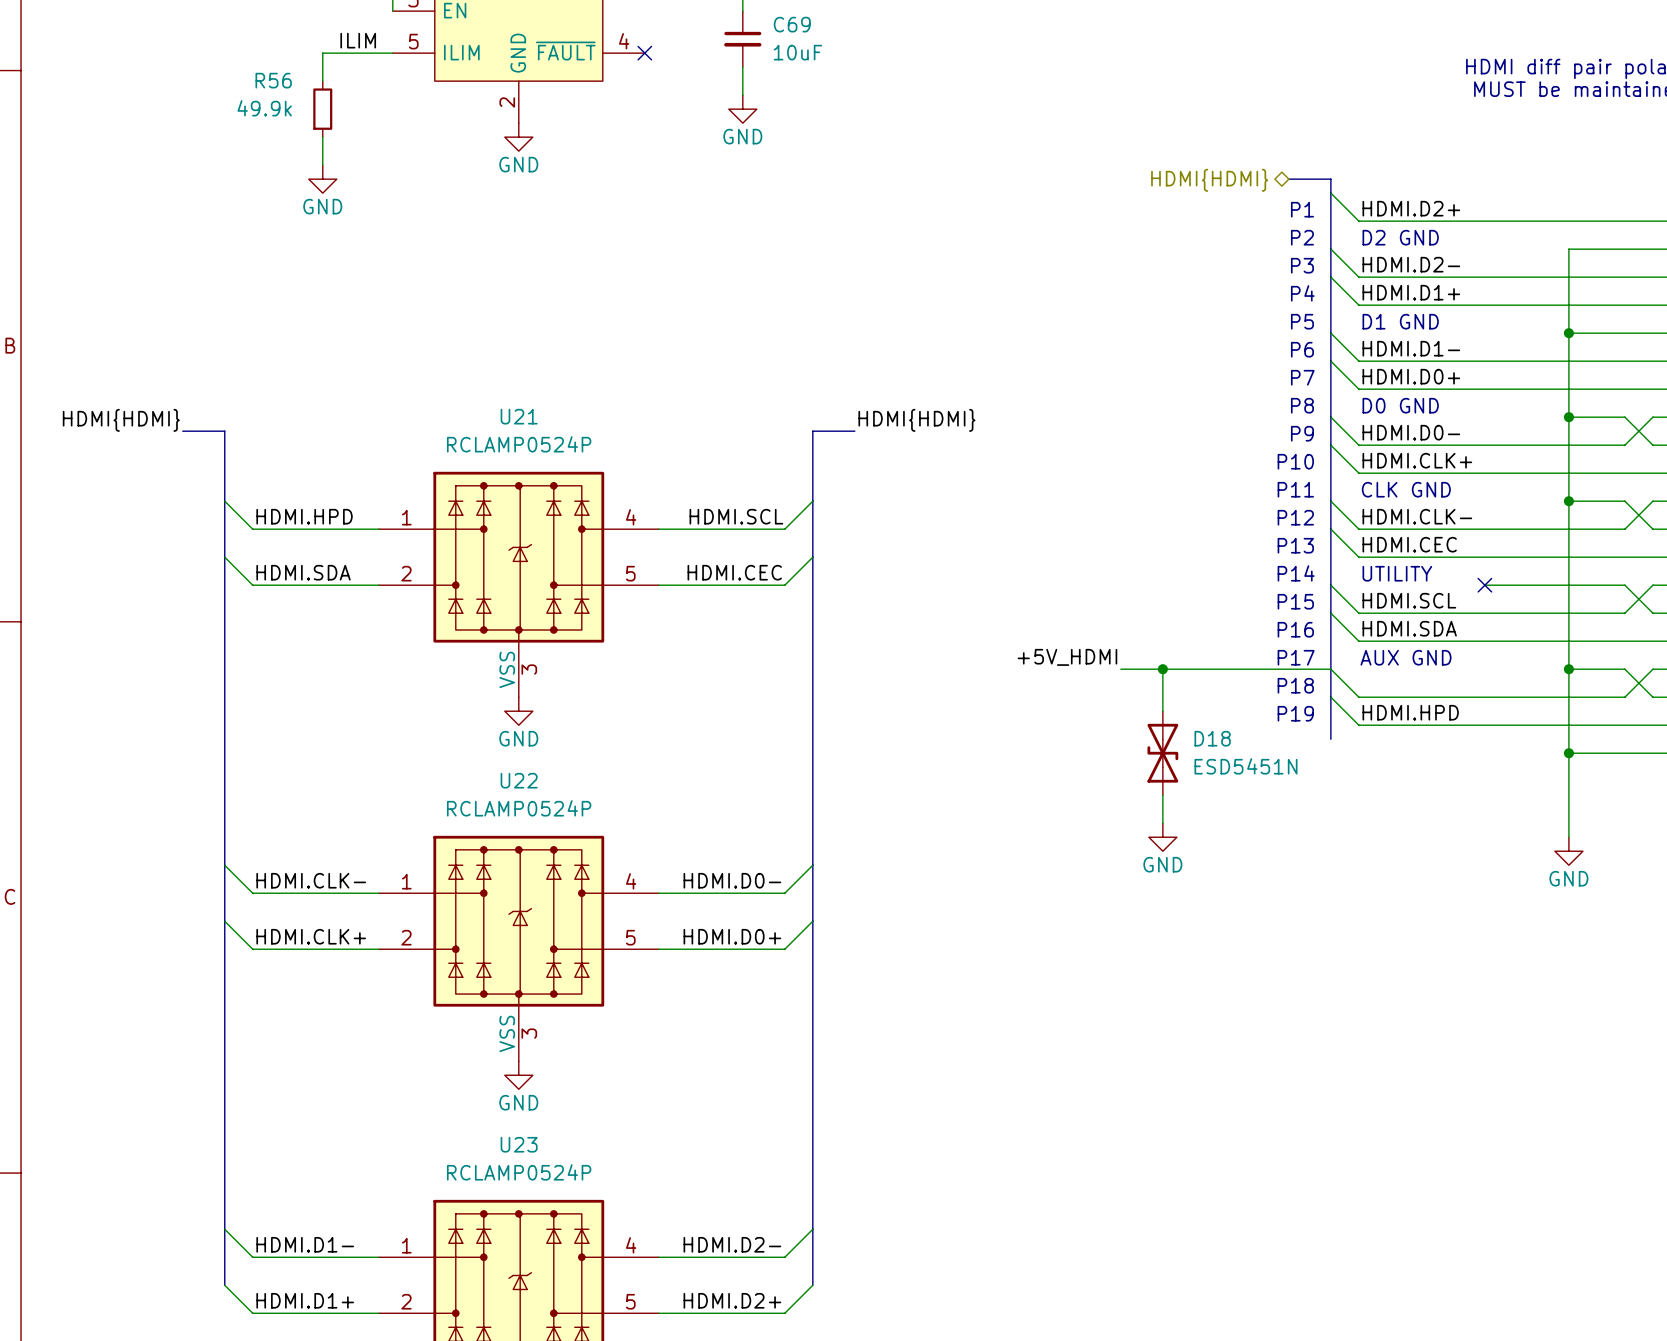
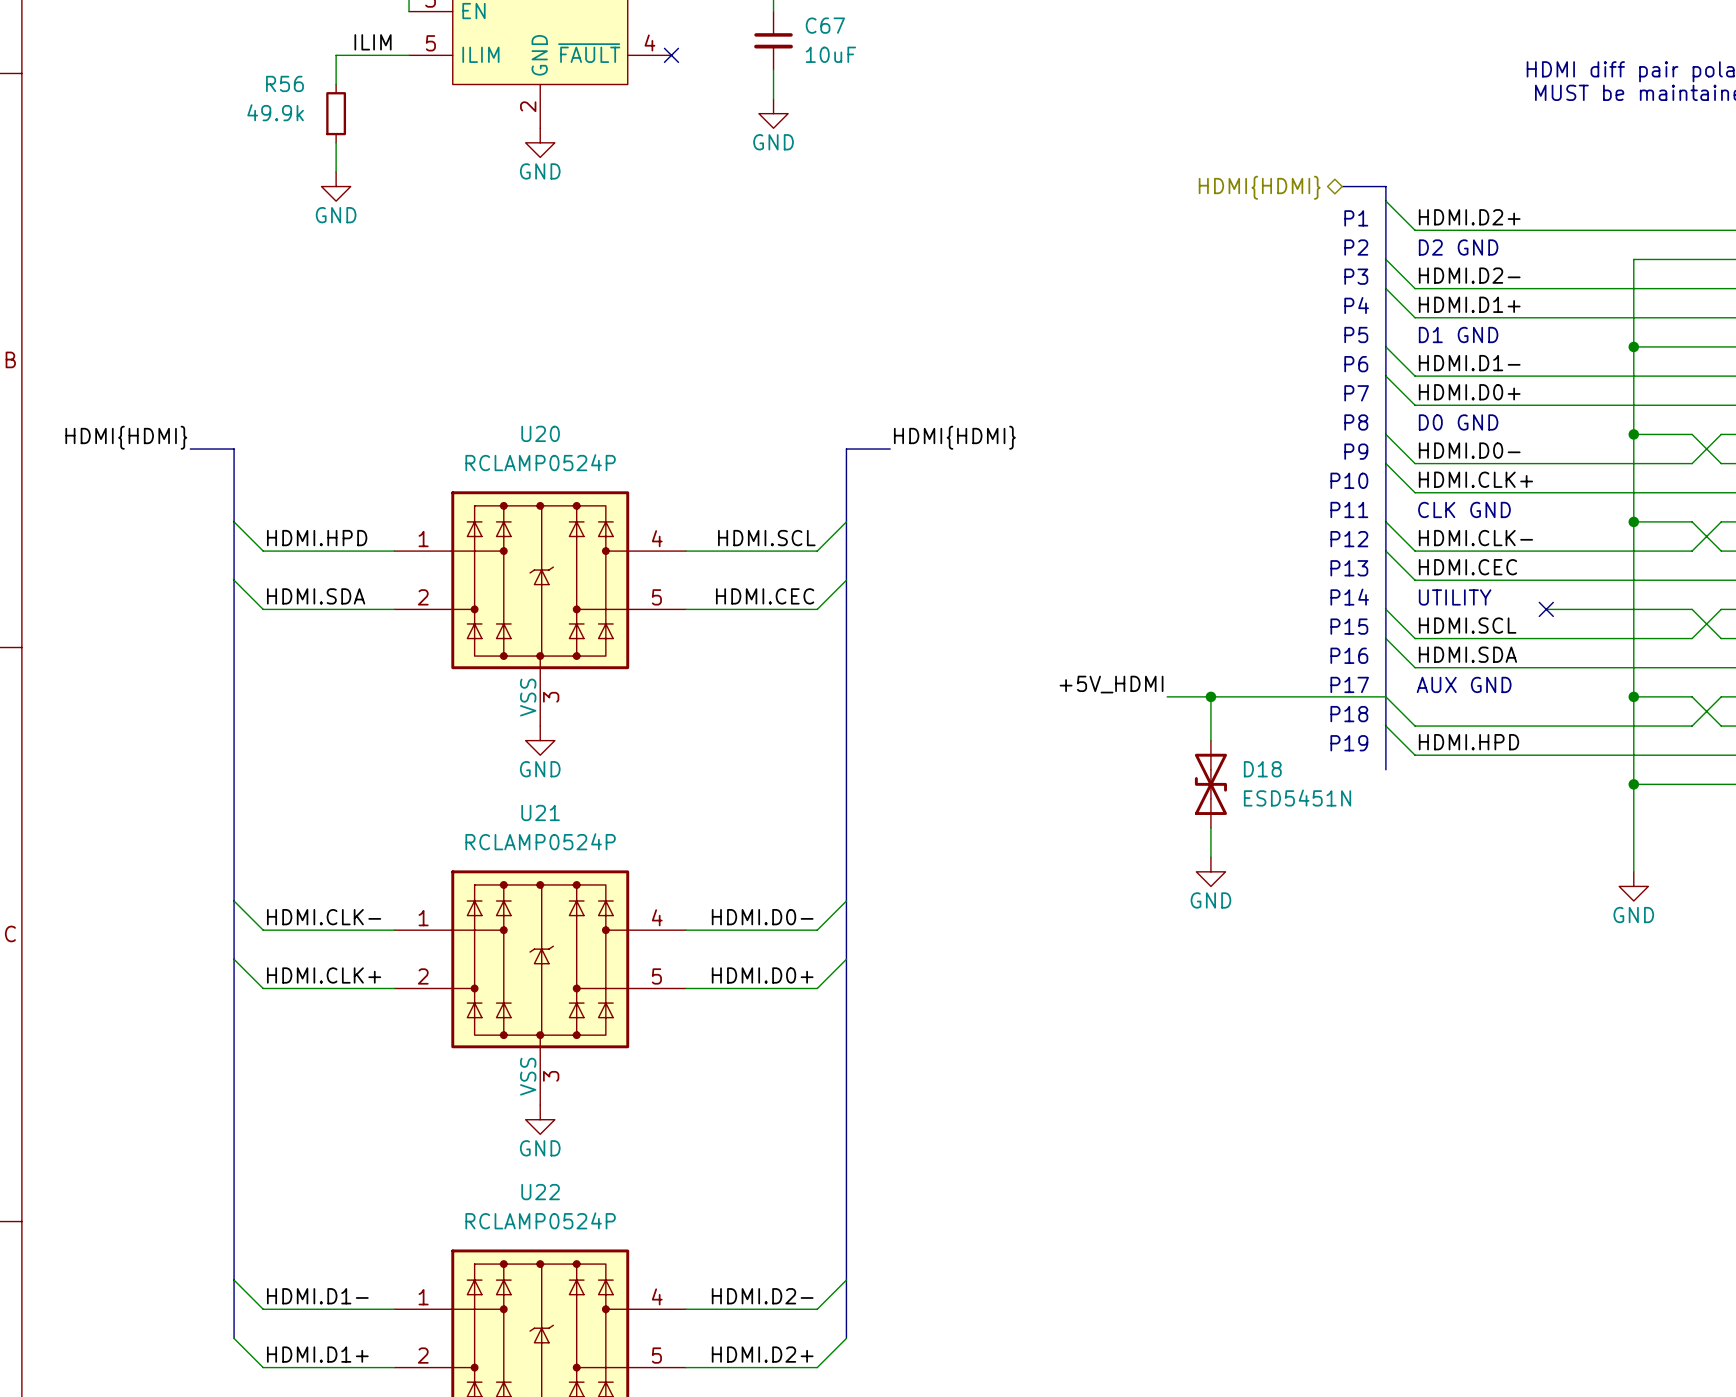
C69 name: C69 (792, 24) -> C67 (825, 25)
U21 name: U21 (519, 416) -> U20 (540, 433)
U22 name: U22 (519, 780) -> U21 (540, 812)
U23 name: U23 (519, 1144) -> U22 (540, 1192)

